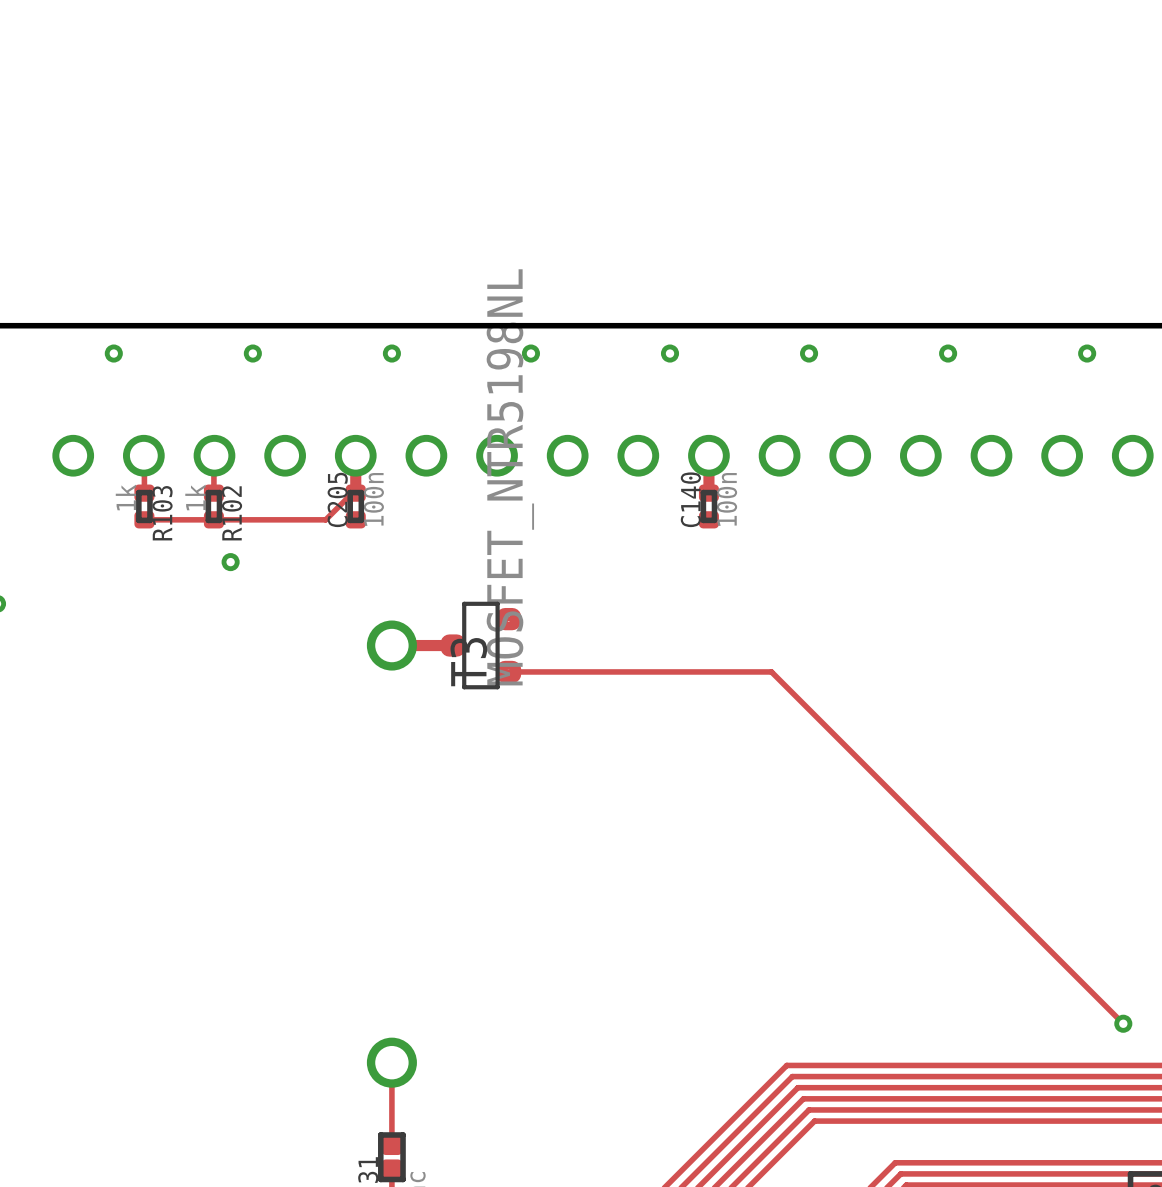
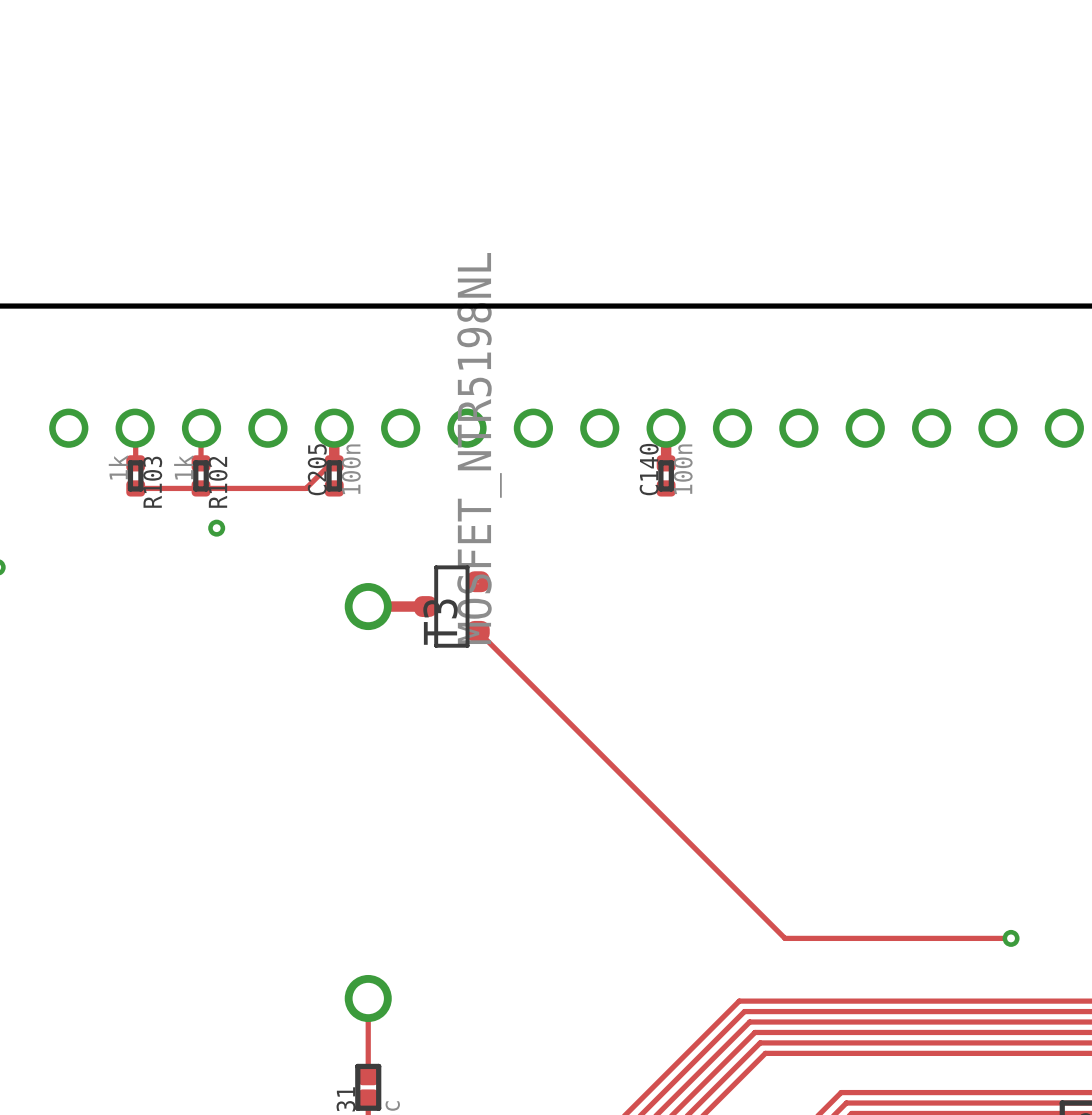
via: (113, 353) -> none
via: (252, 353) -> none
via: (391, 353) -> none
via: (530, 353) -> none
via: (670, 353) -> none
via: (809, 353) -> none
via: (948, 353) -> none
via: (1087, 353) -> none
track: (508, 671) (771, 671) (1123, 1023) -> (477, 631) (785, 938) (1011, 938)
via position: (1123, 1023) -> (1011, 938)

